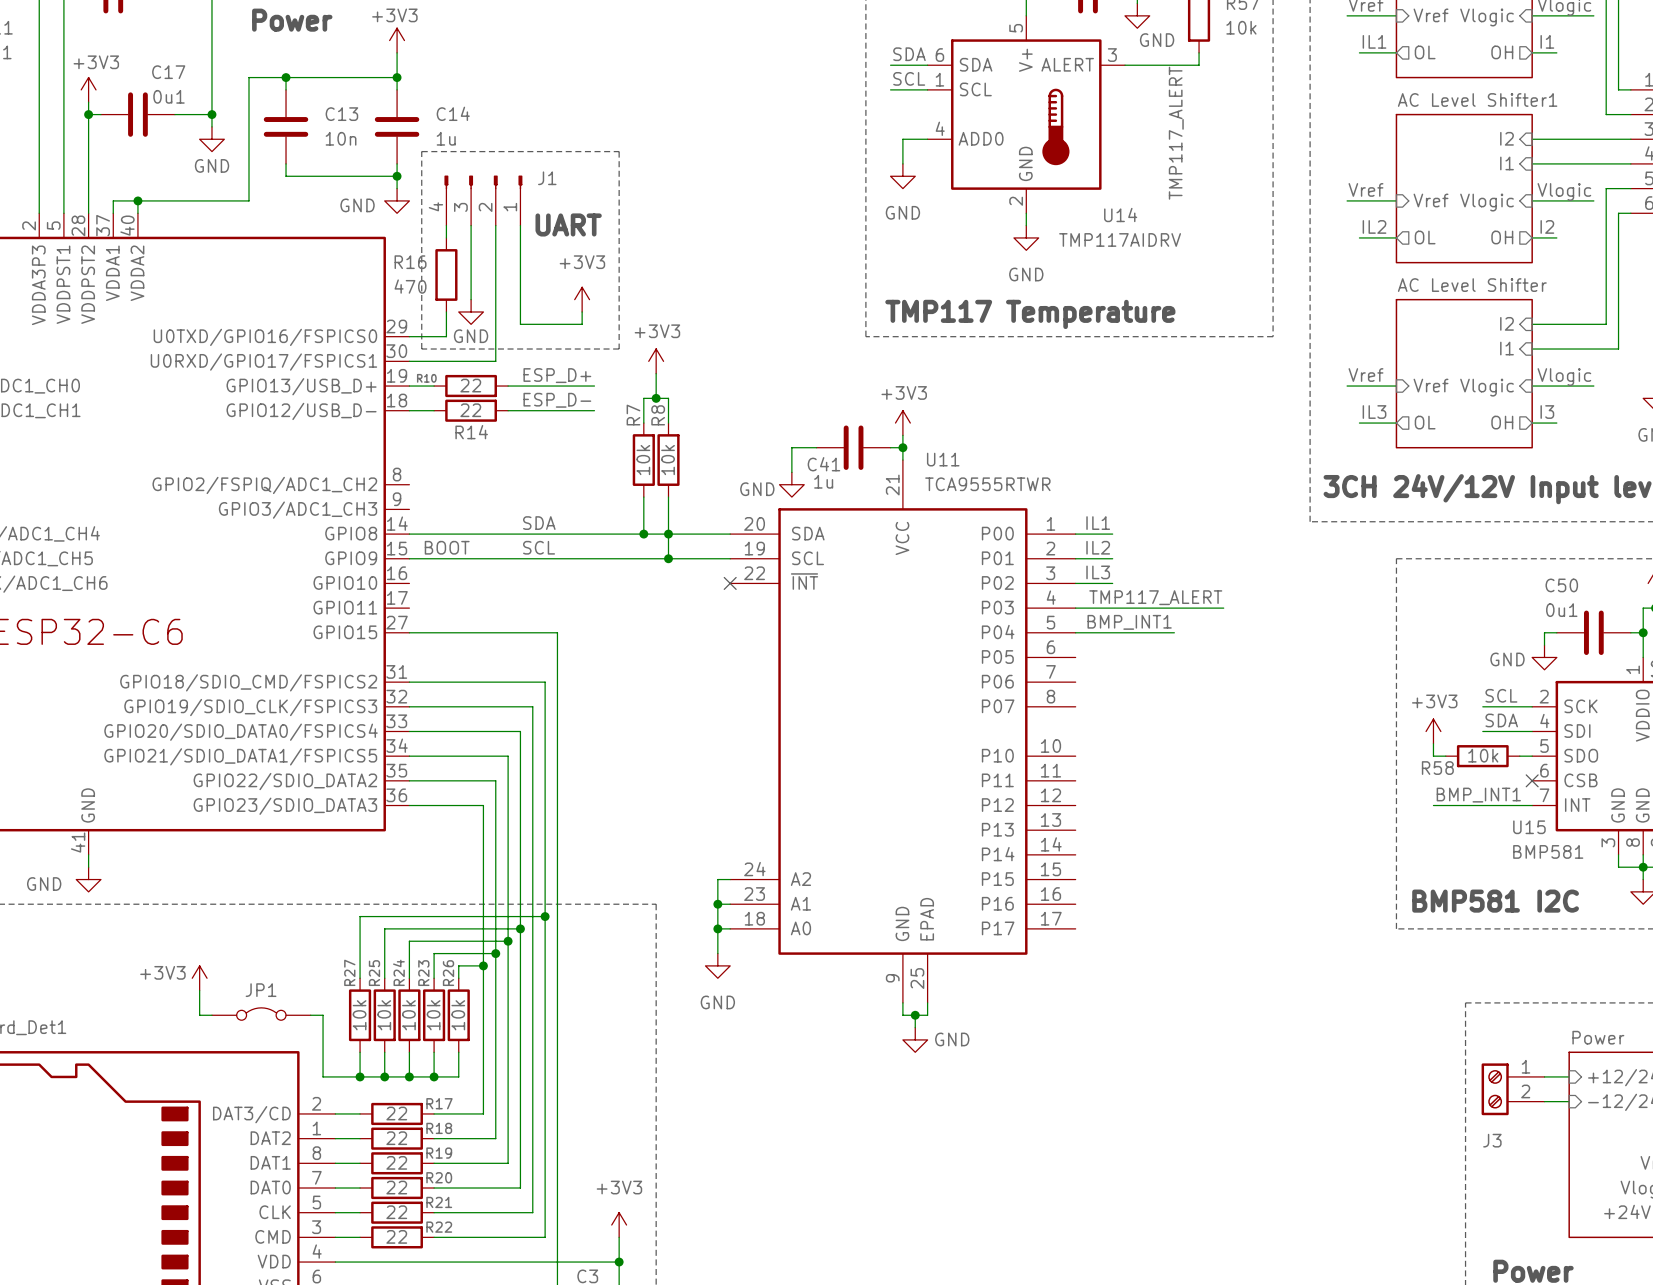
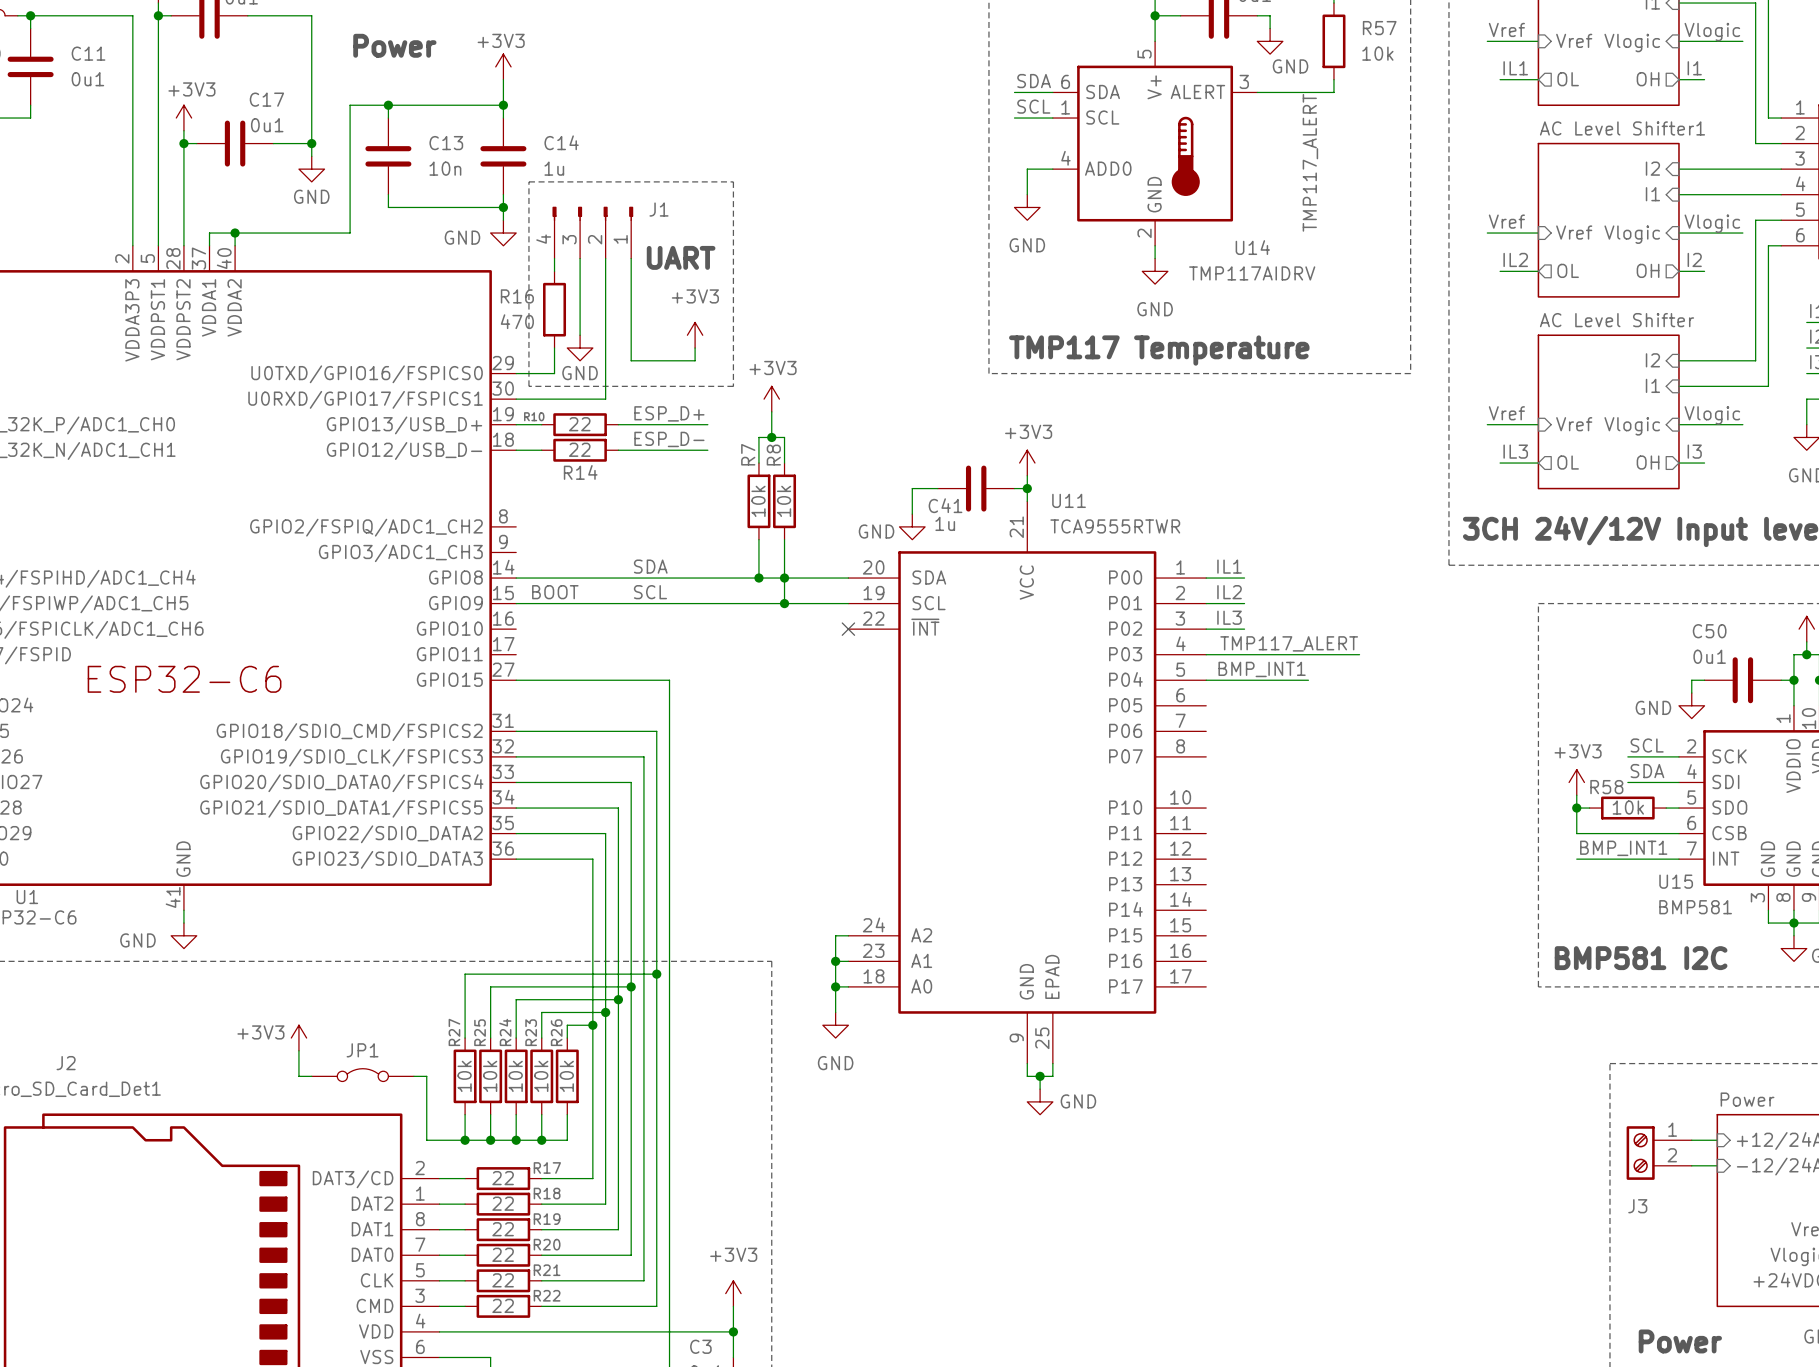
wire: none -> (1576, 808) (1576, 833) (1678, 833)
junction: none -> (1576, 808)
R58 name position: R58 (1437, 768) -> R58 (1606, 787)
no-connect mark: (1532, 780) -> none

